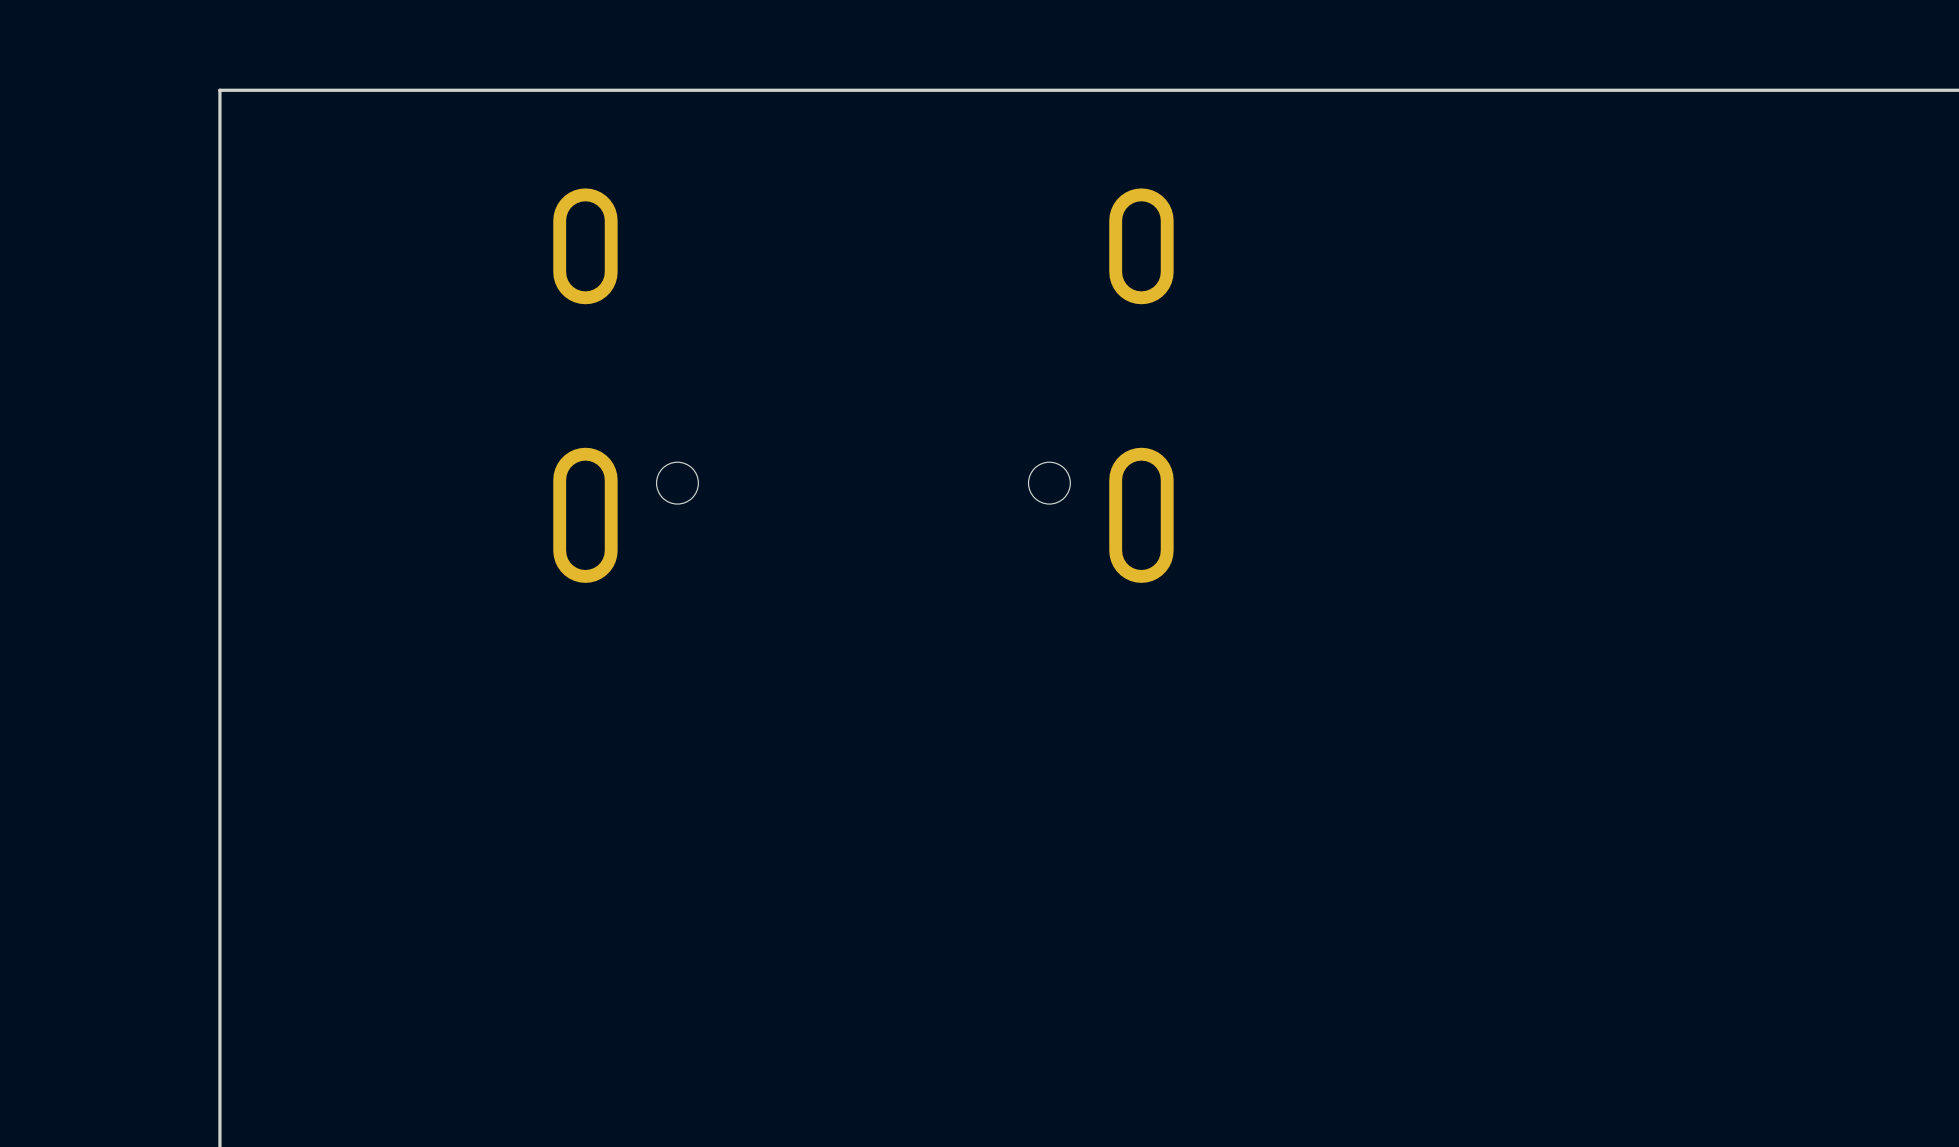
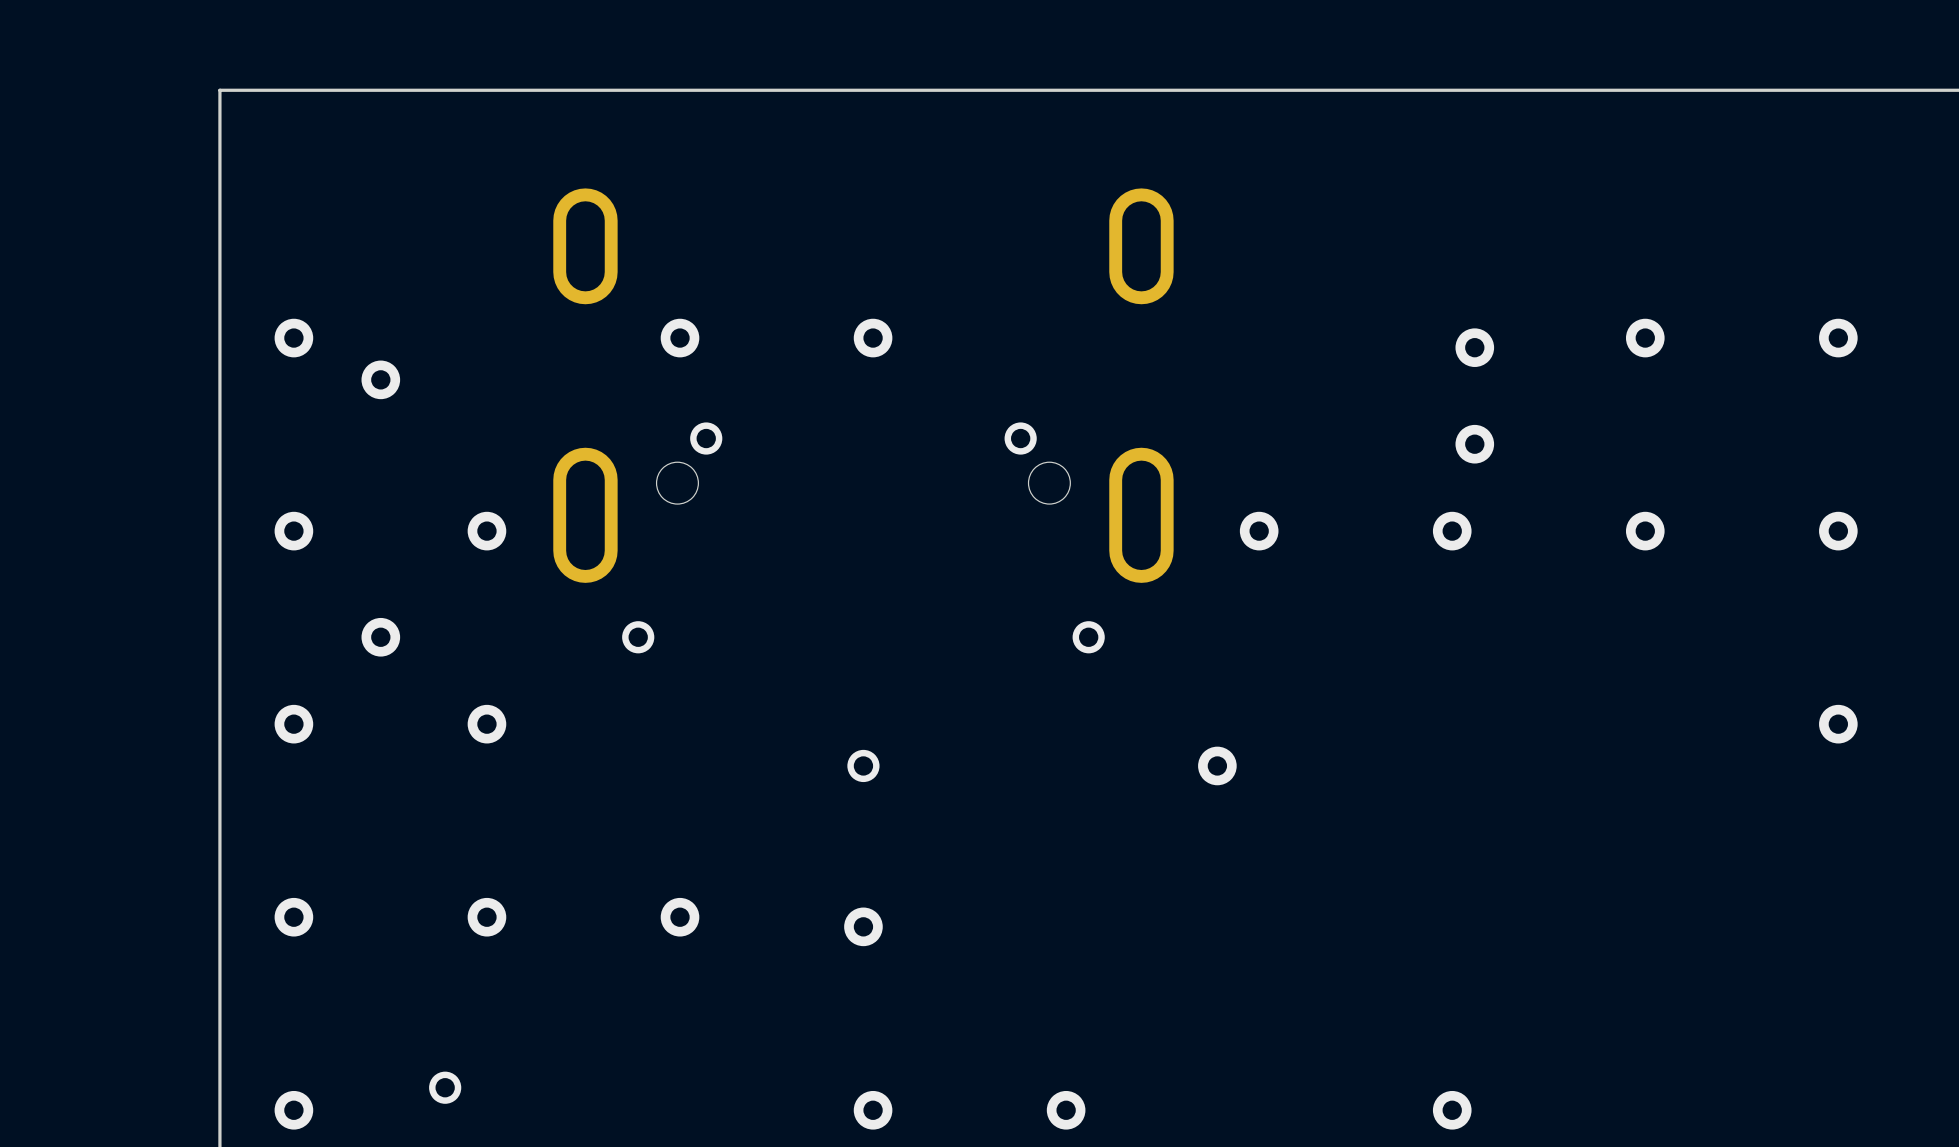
via: none -> (293, 338)
via: none -> (680, 338)
via: none -> (873, 338)
via: none -> (1645, 338)
via: none -> (1838, 338)
via: none -> (1474, 347)
via: none -> (380, 379)
via: none -> (706, 438)
via: none -> (1020, 438)
via: none -> (1474, 444)
via: none -> (293, 531)
via: none -> (486, 531)
via: none -> (1259, 531)
via: none -> (1452, 531)
via: none -> (1645, 531)
via: none -> (1838, 531)
via: none -> (380, 637)
via: none -> (638, 637)
via: none -> (1088, 637)
via: none -> (293, 724)
via: none -> (486, 724)
via: none -> (1838, 724)
via: none -> (863, 765)
via: none -> (1217, 765)
via: none -> (293, 917)
via: none -> (486, 917)
via: none -> (680, 917)
via: none -> (863, 926)
via: none -> (445, 1087)
via: none -> (293, 1110)
via: none -> (873, 1110)
via: none -> (1066, 1110)
via: none -> (1452, 1110)

